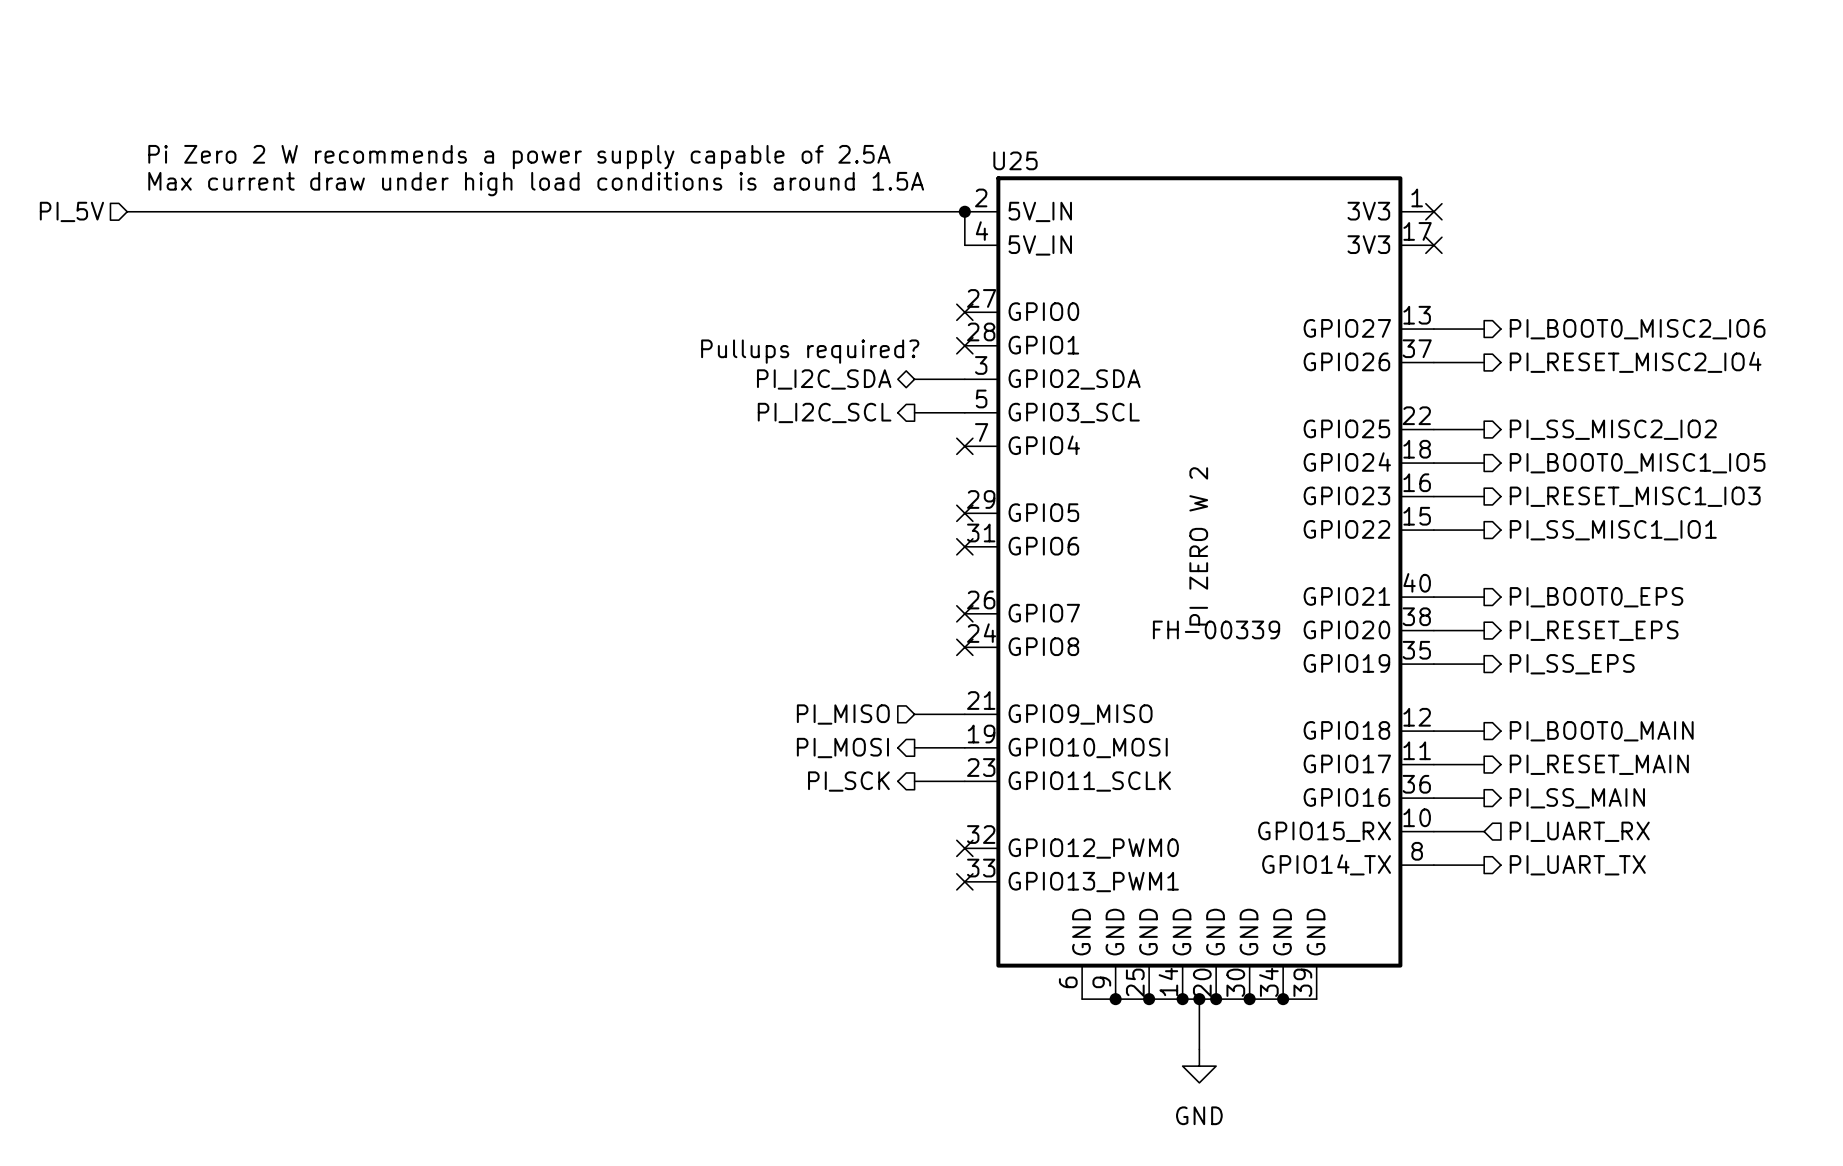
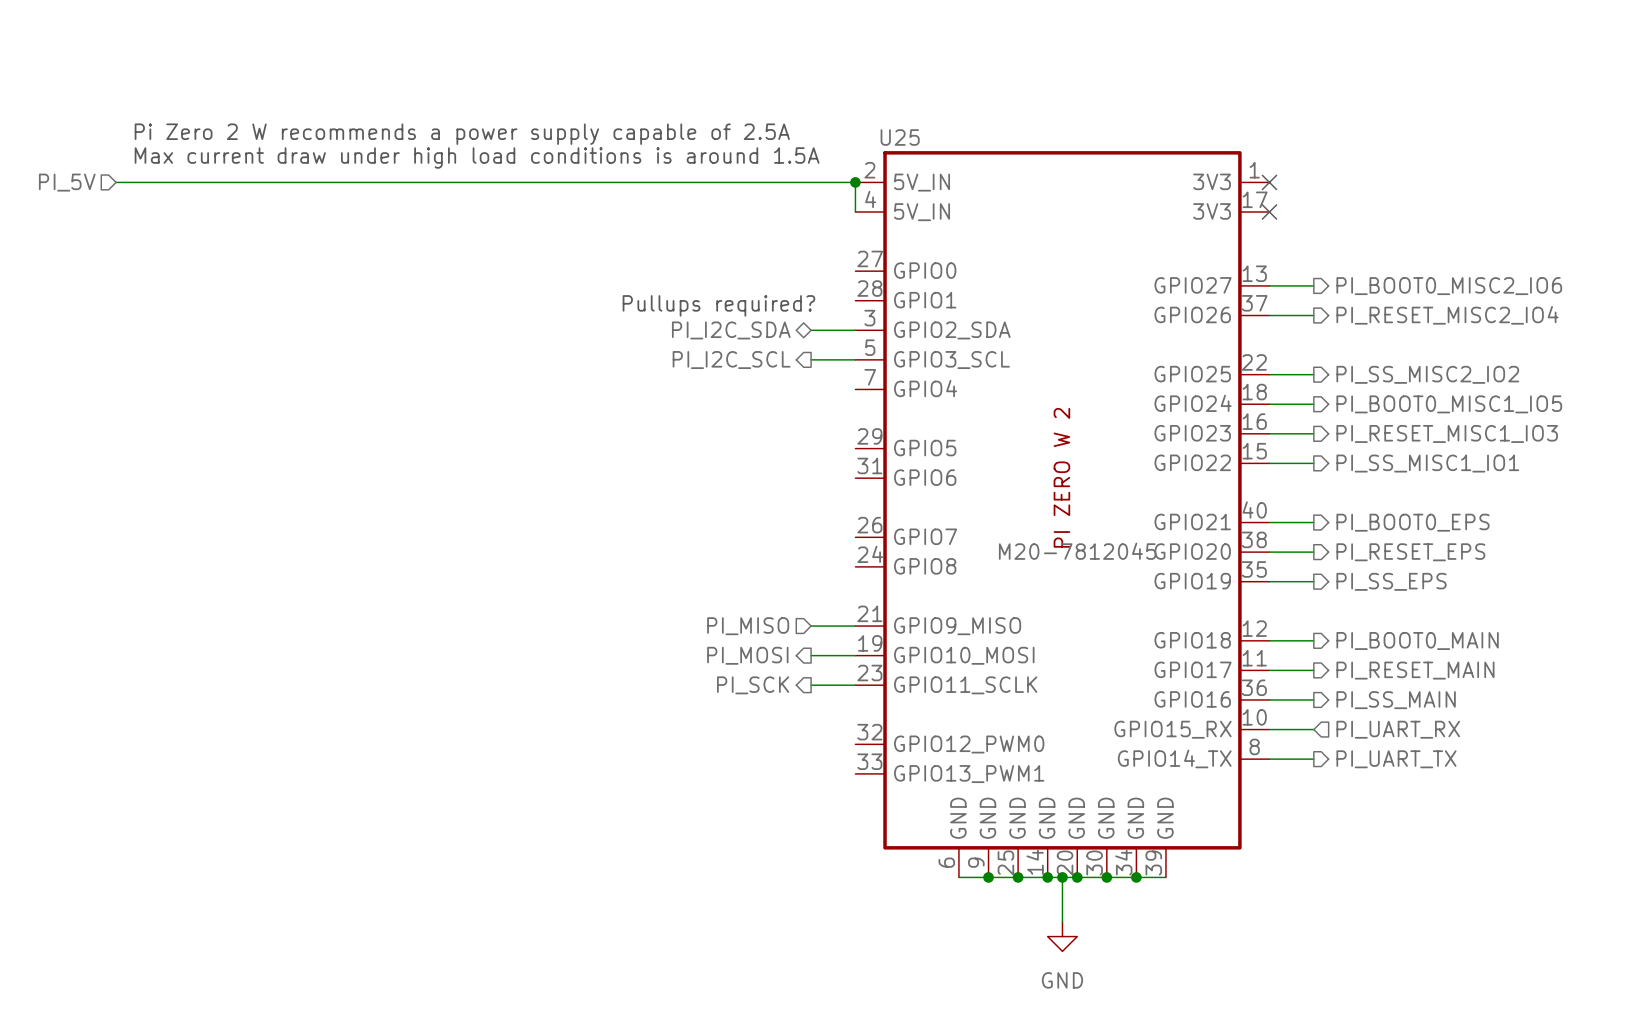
no-connect mark: (964, 312) -> none
no-connect mark: (964, 345) -> none
no-connect mark: (964, 446) -> none
no-connect mark: (964, 513) -> none
no-connect mark: (964, 546) -> none
no-connect mark: (964, 613) -> none
U25 value: FH-00339 (1216, 629) -> M20-7812045 (1077, 551)
no-connect mark: (964, 647) -> none
no-connect mark: (964, 848) -> none
no-connect mark: (964, 881) -> none

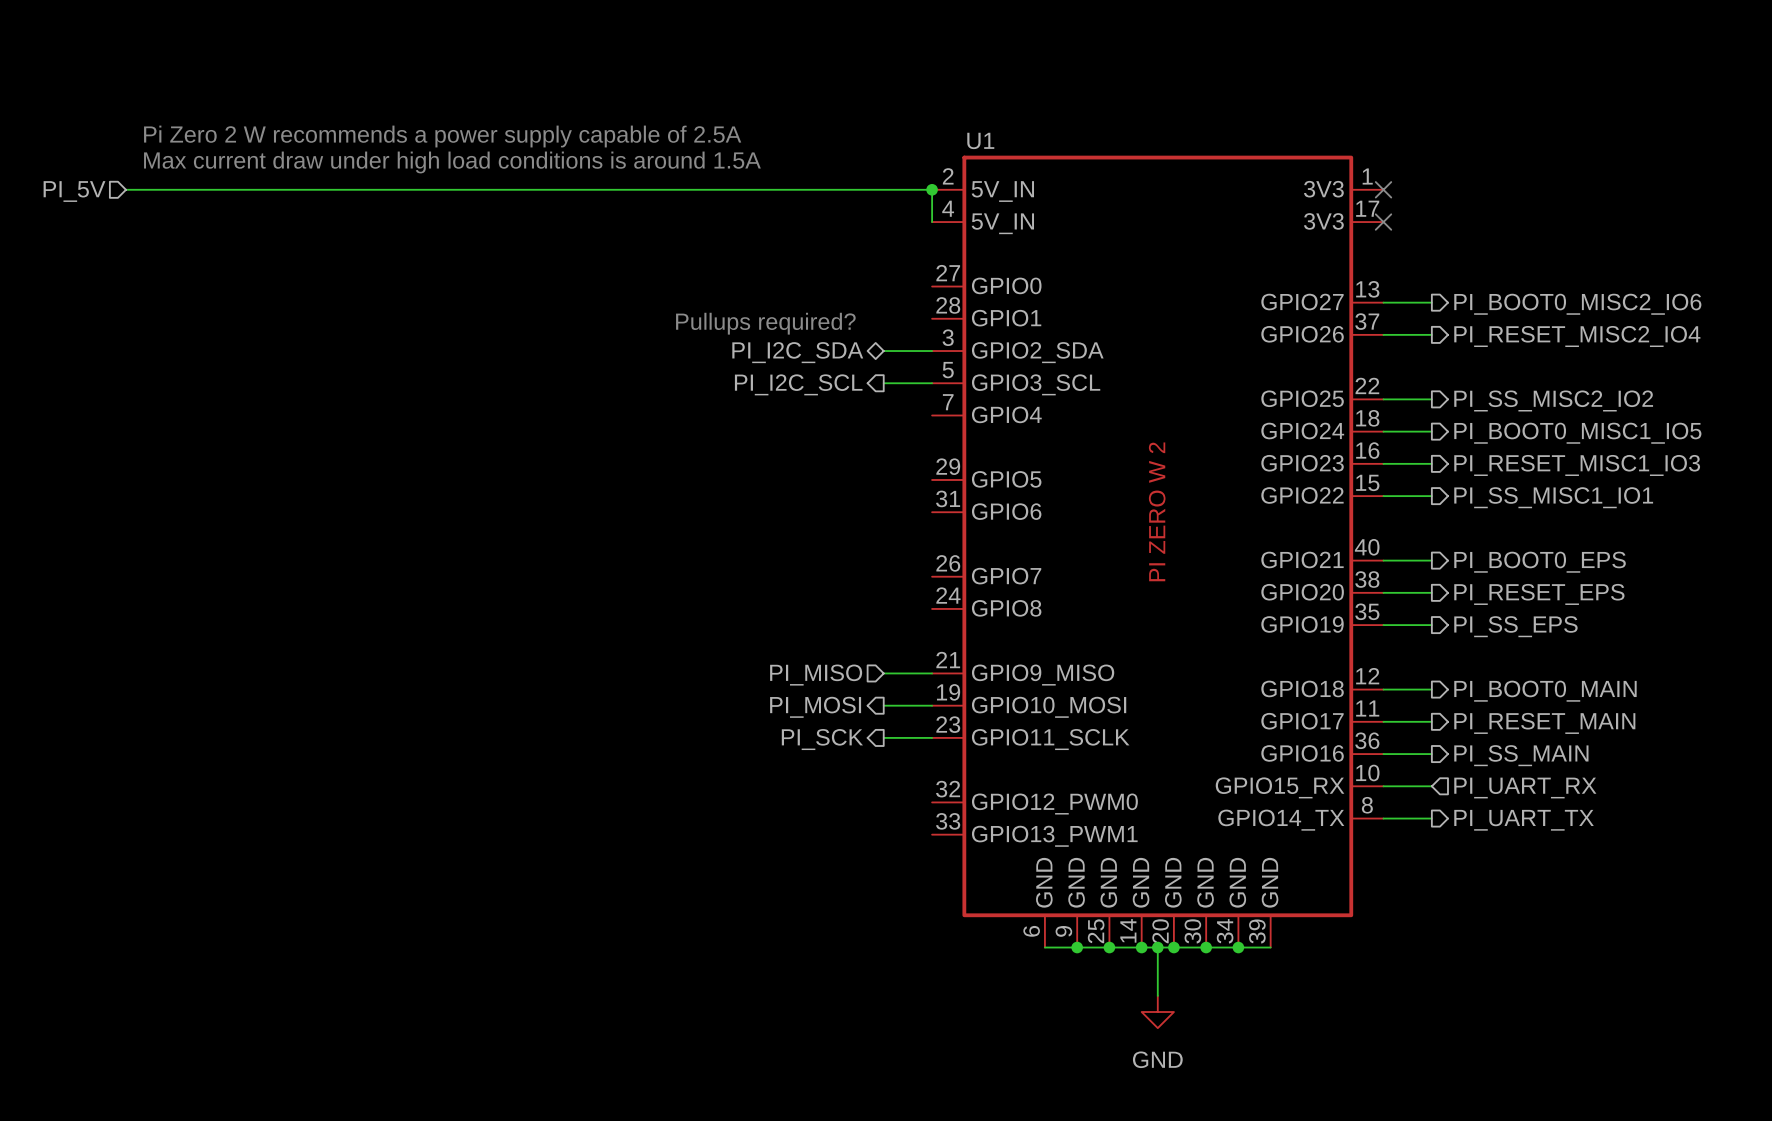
U25 name: U25 (900, 137) -> U1 (980, 140)
U25 value: M20-7812045 (1077, 551) -> none

